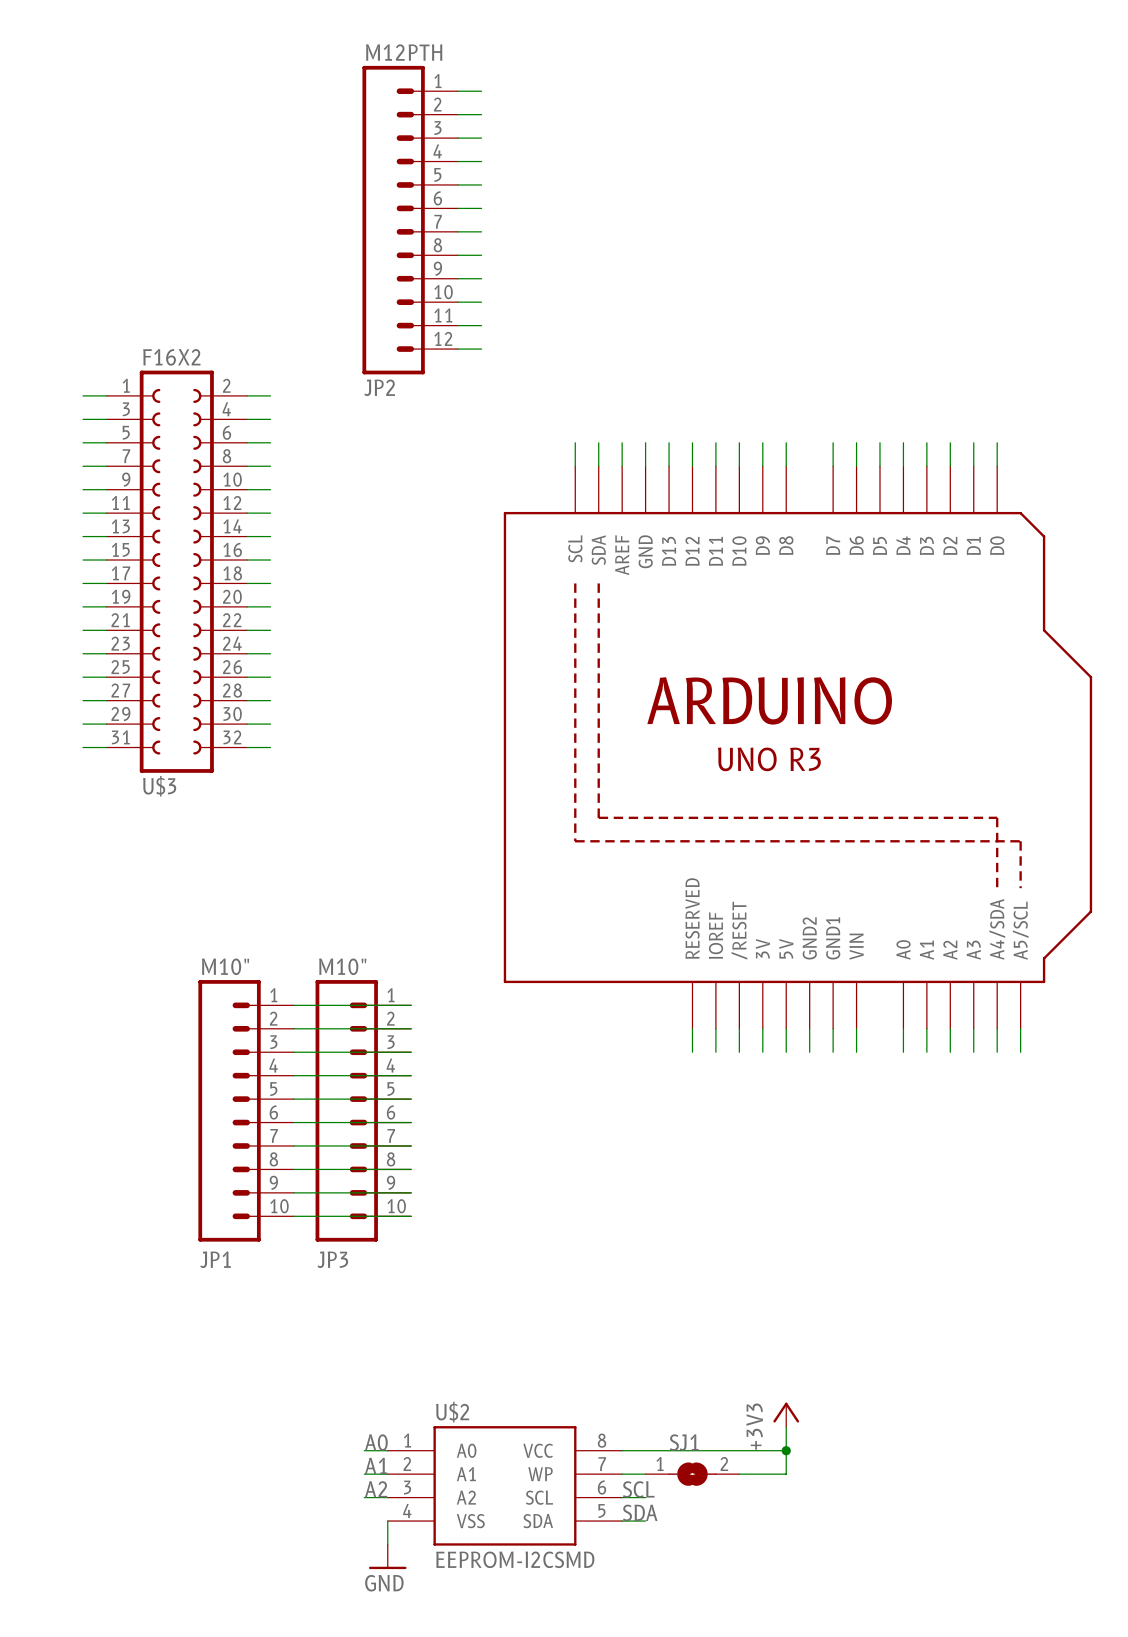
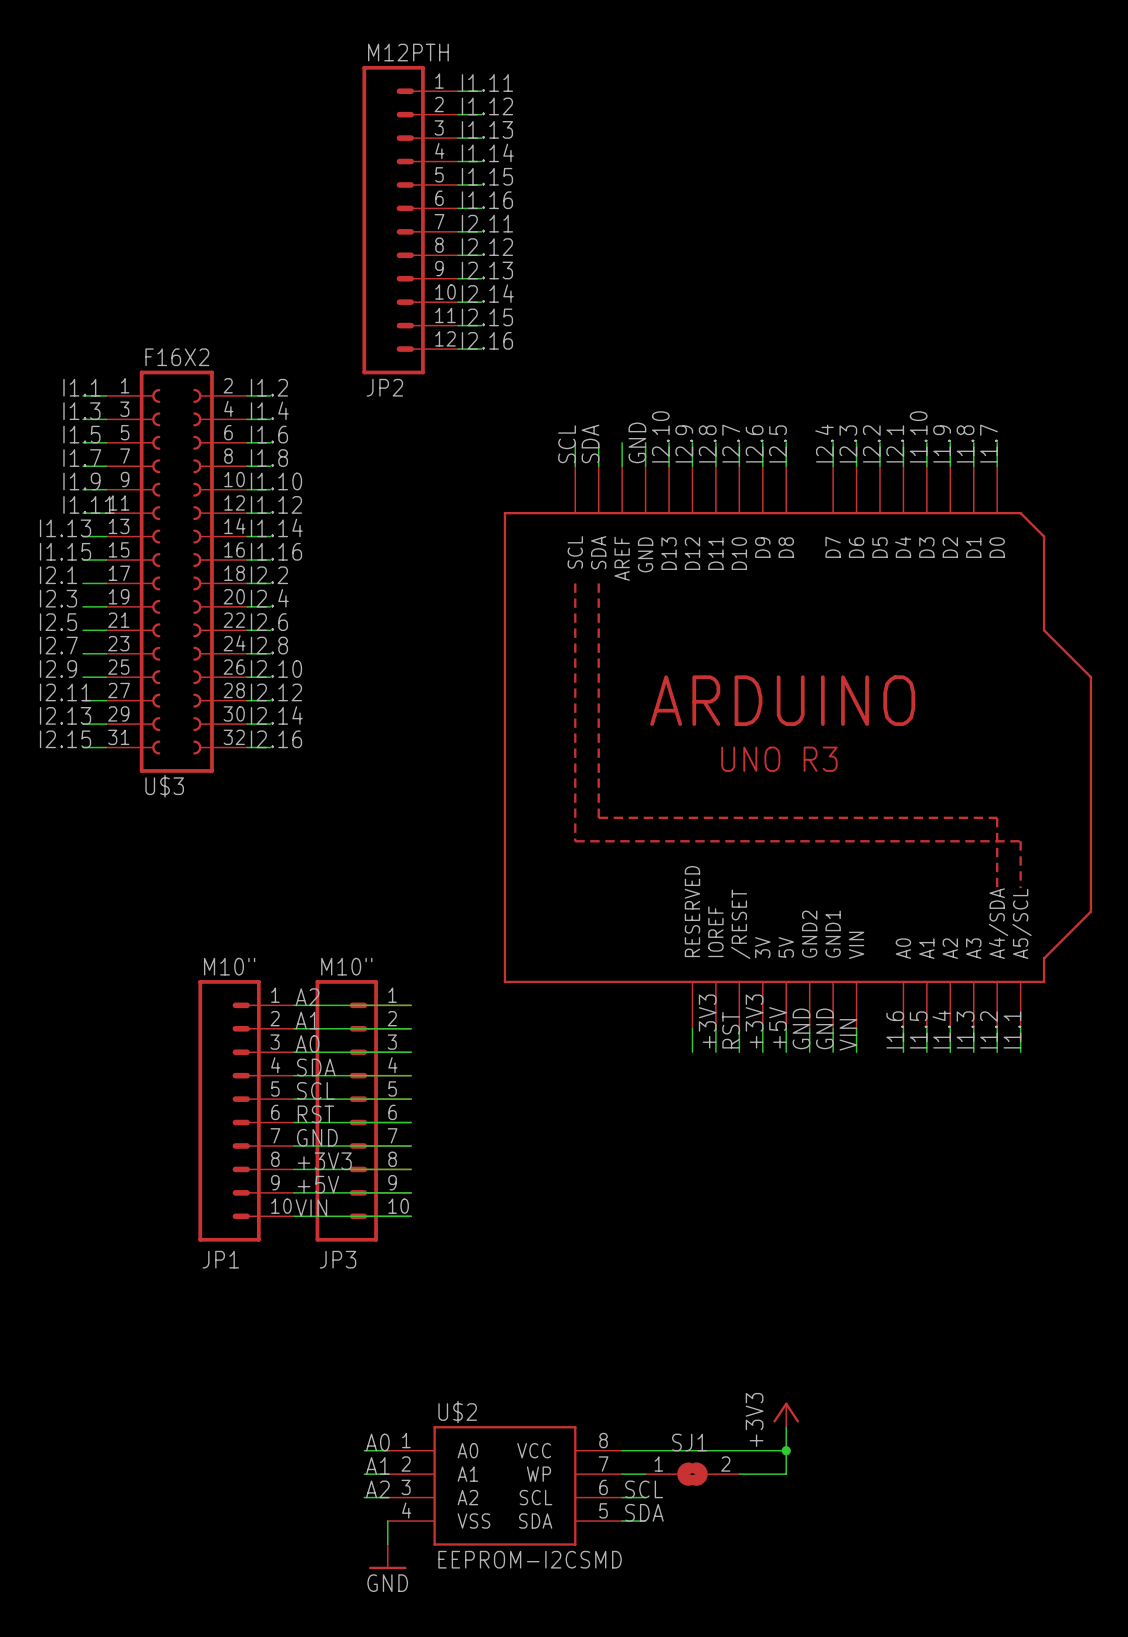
label: none -> I1.11 (487, 83)
label: none -> I1.12 (487, 106)
label: none -> I1.13 (487, 129)
label: none -> I1.14 (487, 152)
label: none -> I1.15 (487, 176)
label: none -> I1.16 (487, 200)
label: none -> I2.11 (487, 223)
label: none -> I2.12 (487, 247)
label: none -> I2.13 (487, 270)
label: none -> I2.14 (487, 293)
label: none -> I2.15 (487, 317)
label: none -> I2.16 (487, 340)
label: none -> I1.1 (81, 387)
label: none -> I1.2 (269, 387)
label: none -> I1.3 (81, 411)
label: none -> I1.4 (269, 410)
label: none -> I1.5 (81, 434)
label: none -> I1.6 (269, 434)
label: none -> I2.10 (660, 436)
label: none -> I1.10 (918, 436)
label: none -> GND (637, 442)
label: none -> I2.9 (684, 443)
label: none -> I2.8 (707, 443)
label: none -> I2.7 (731, 443)
label: none -> I2.6 (754, 443)
label: none -> I2.4 (824, 443)
label: none -> I1.9 (942, 443)
label: none -> I1.8 (965, 443)
label: none -> I1.7 (988, 443)
label: none -> SDA (590, 443)
label: none -> I2.5 (778, 443)
label: none -> I2.3 (848, 443)
label: none -> I2.2 (871, 443)
label: none -> I2.1 (895, 443)
label: none -> SCL (567, 444)
label: none -> I1.7 (82, 458)
label: none -> I1.8 (269, 458)
label: none -> I1.9 (81, 481)
label: none -> I1.10 (276, 481)
label: none -> I1.11 (88, 504)
label: none -> I1.12 (276, 504)
label: none -> I1.13 (65, 528)
label: none -> I1.14 (276, 527)
label: none -> I1.15 (65, 551)
label: none -> I1.16 (276, 551)
label: none -> I2.1 (58, 575)
label: none -> I2.2 (269, 575)
label: none -> I2.3 (58, 598)
label: none -> I2.4 (269, 598)
label: none -> I2.5 (58, 622)
label: none -> I2.6 (269, 622)
label: none -> I2.7 (58, 645)
label: none -> I2.8 (269, 645)
label: none -> I2.9 (58, 669)
label: none -> I2.10 (276, 669)
label: none -> I2.11 (65, 692)
label: none -> I2.12 (276, 692)
label: none -> I2.13 (65, 715)
label: none -> I2.14 (276, 715)
label: none -> I2.15 (65, 739)
label: none -> I2.16 (276, 739)
label: none -> A2 (307, 997)
label: none -> A1 (307, 1020)
label: none -> +3V3 (707, 1021)
label: none -> +3V3 (754, 1021)
label: none -> GND (801, 1028)
label: none -> GND (824, 1028)
label: none -> +5V (778, 1027)
label: none -> I1.6 (895, 1029)
label: none -> I1.4 (941, 1029)
label: none -> RST (731, 1030)
label: none -> I1.5 (918, 1029)
label: none -> I1.3 (965, 1029)
label: none -> I1.2 (988, 1029)
label: none -> I1.1 (1012, 1029)
label: none -> VIN (848, 1034)
label: none -> A0 (307, 1044)
label: none -> SDA (316, 1067)
label: none -> SCL (315, 1090)
label: none -> RST (315, 1114)
label: none -> GND (317, 1137)
label: none -> +3V3 (324, 1161)
label: none -> +5V (318, 1184)
label: none -> VIN (311, 1208)

